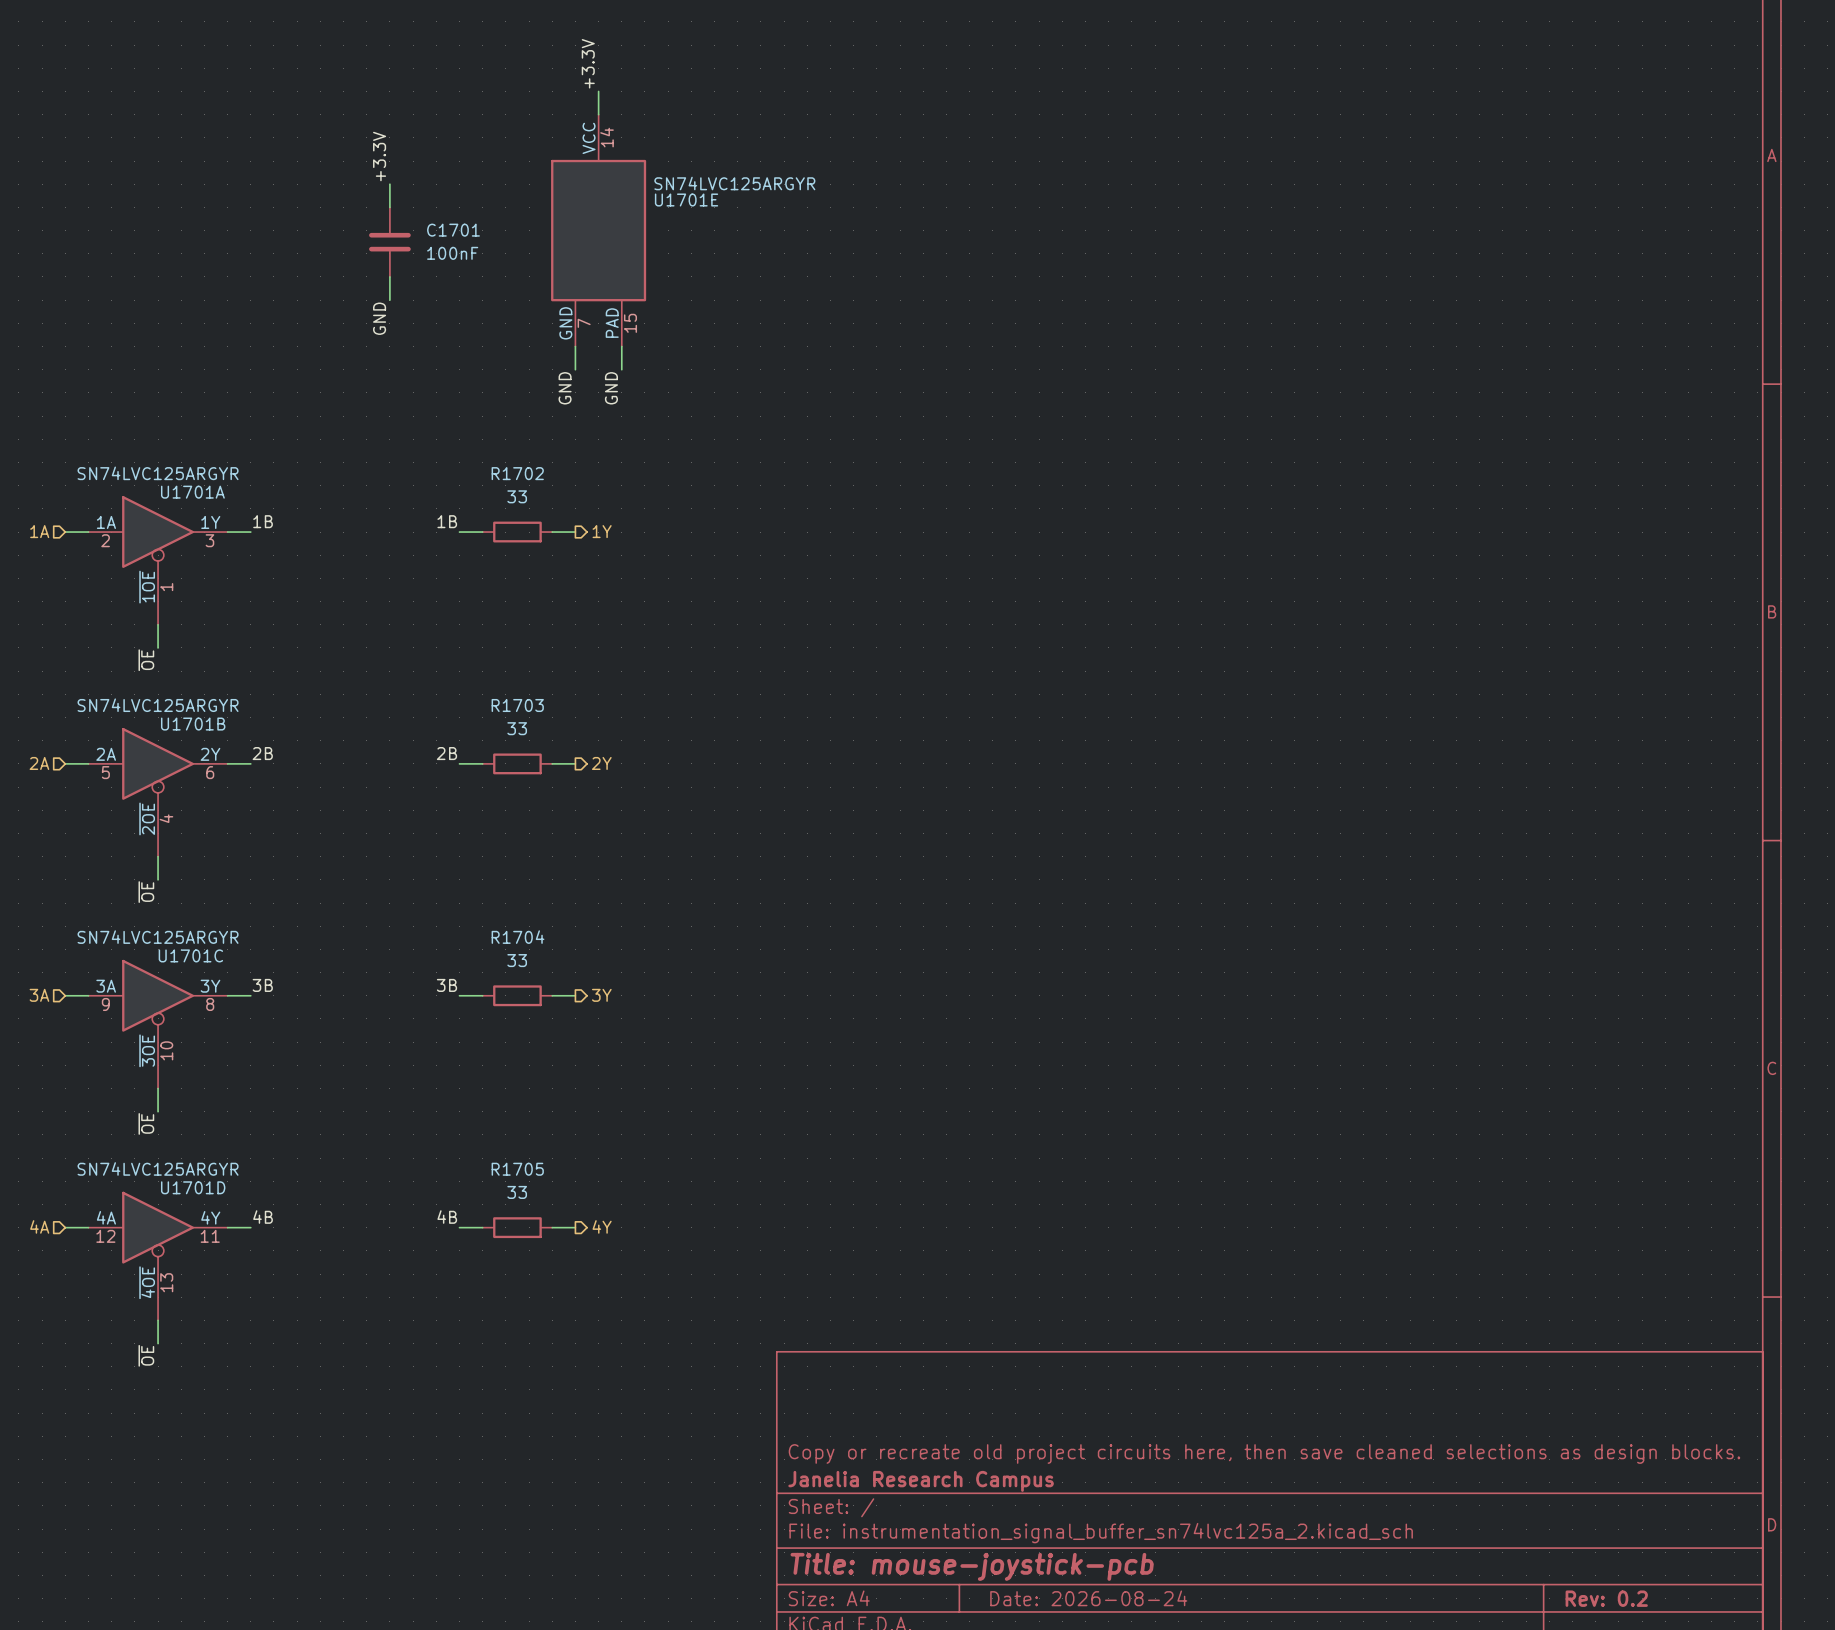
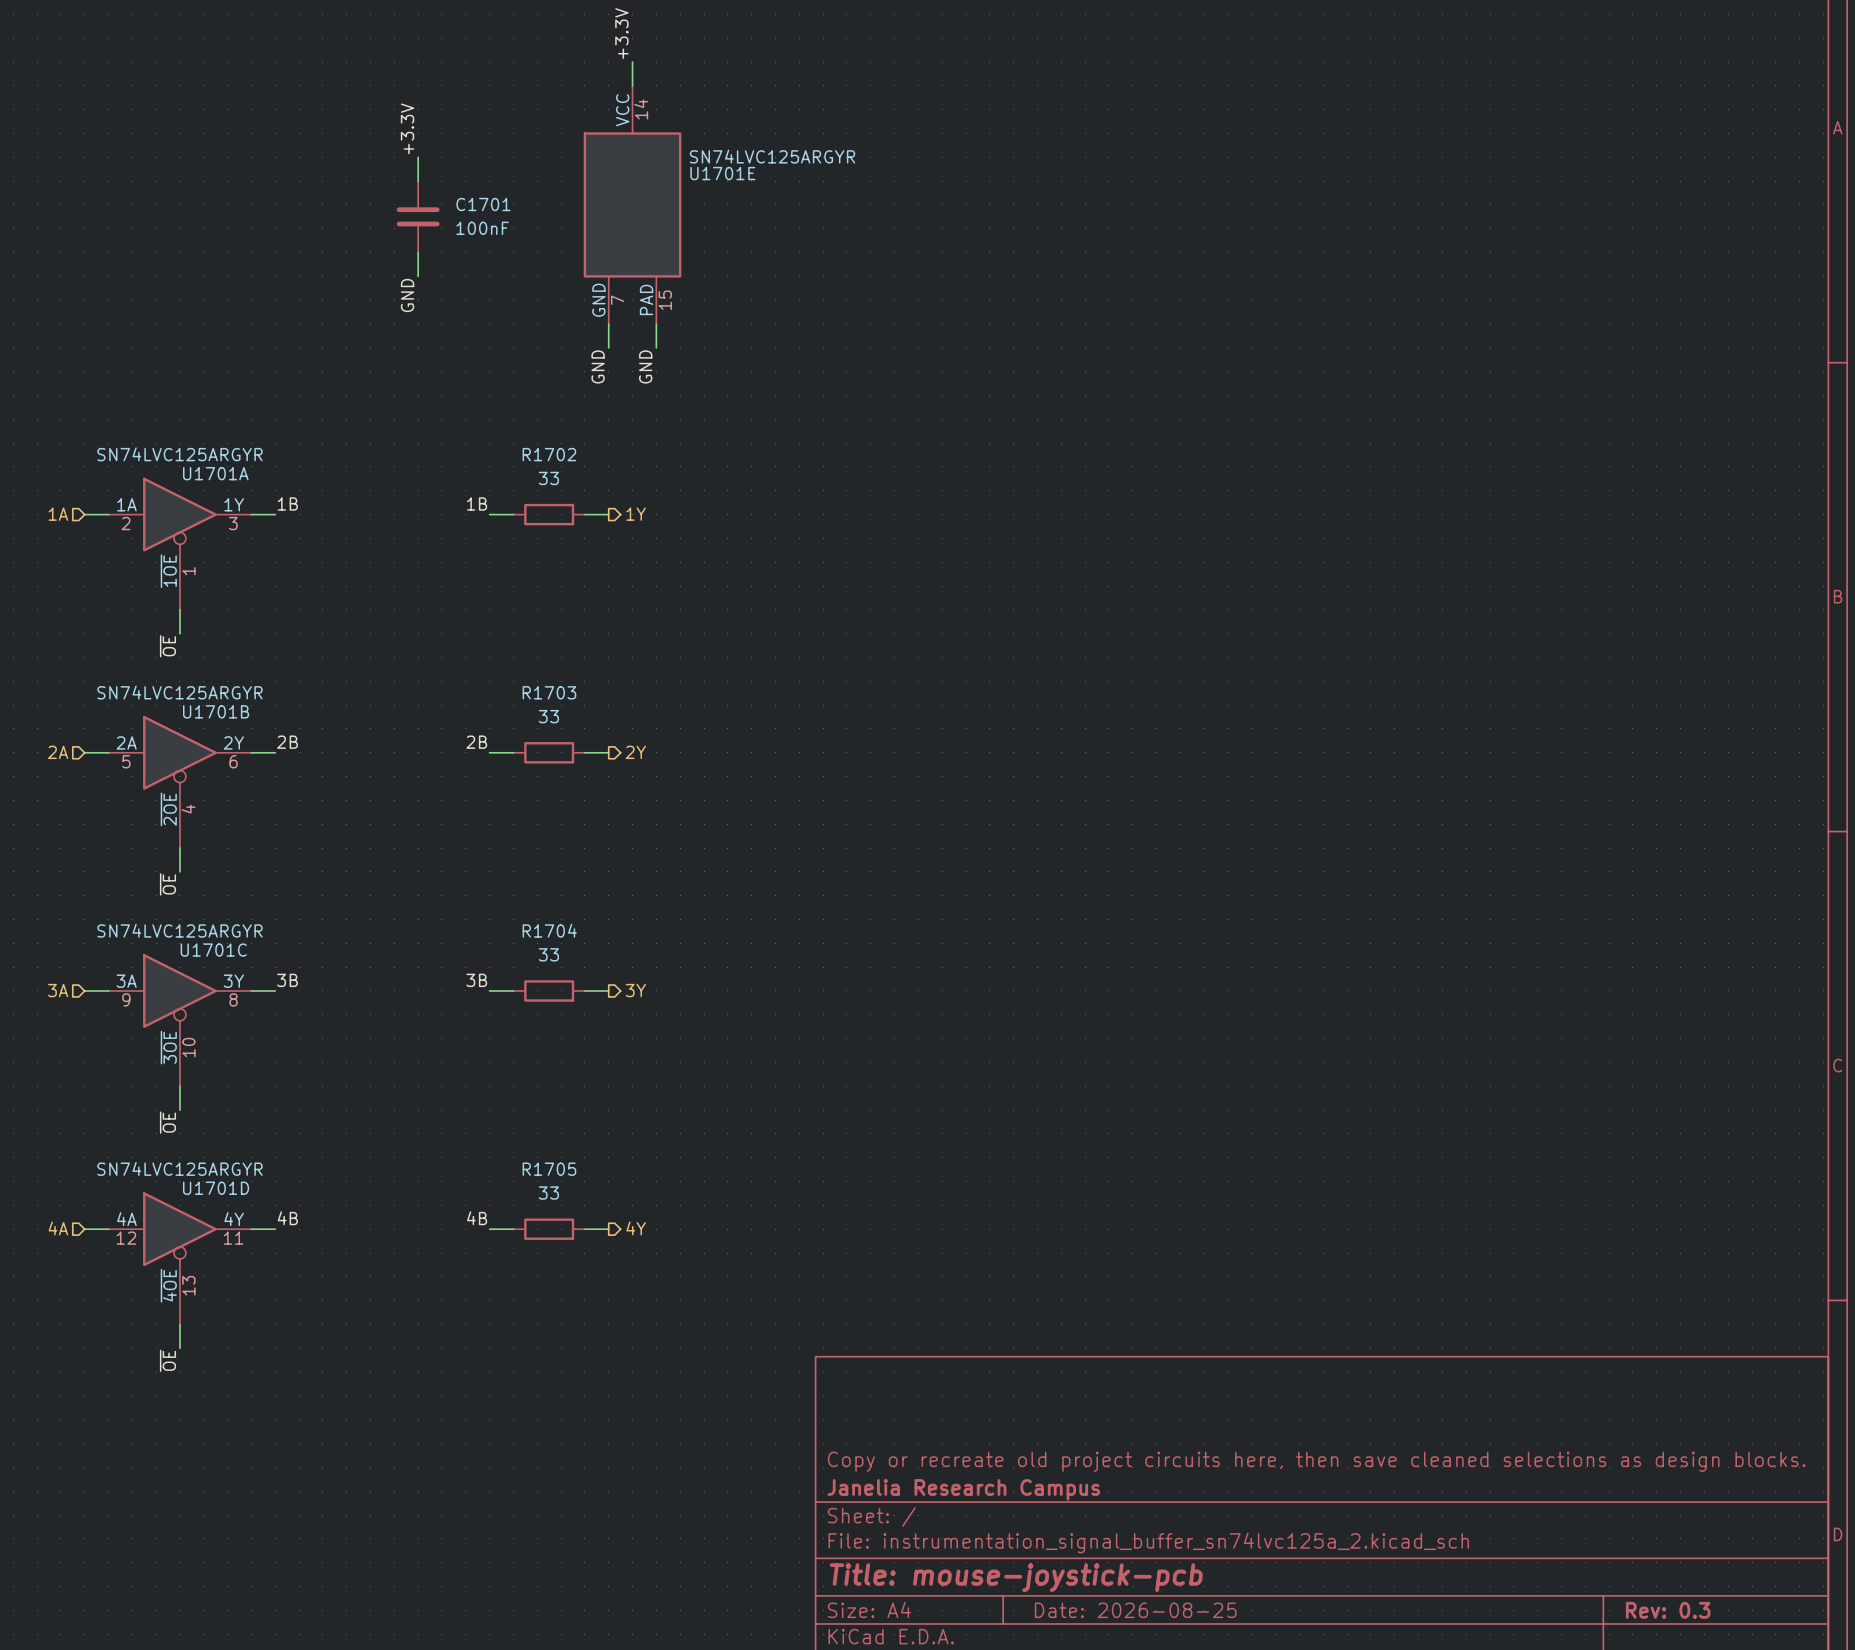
title block: Date: 2026-08-24 (1088, 1598) -> Date: 2026-08-25 (1135, 1610)
title block: Rev: 0.2 (1606, 1598) -> Rev: 0.3 (1668, 1610)

